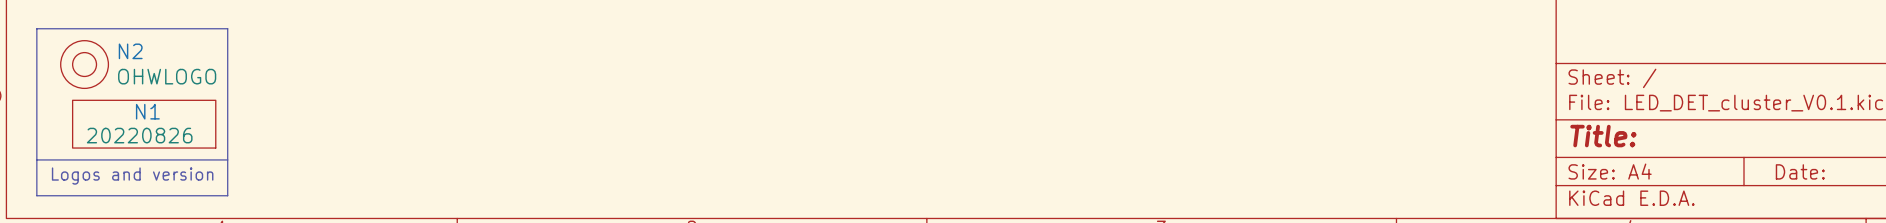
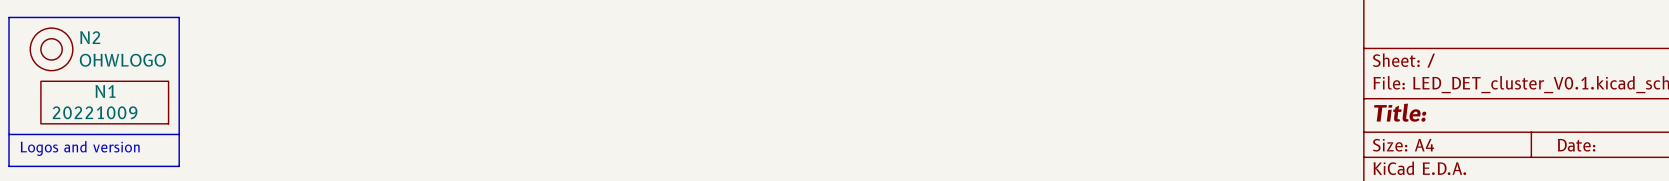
N1 value: 20220826 (139, 135) -> 20221009 (95, 112)

